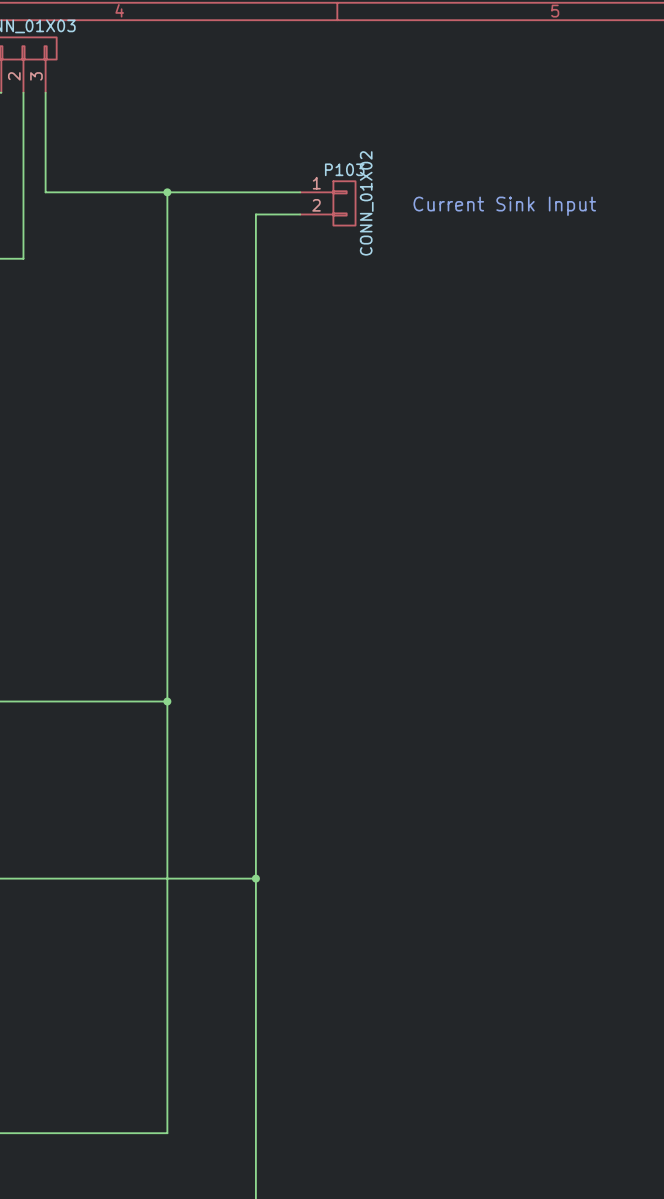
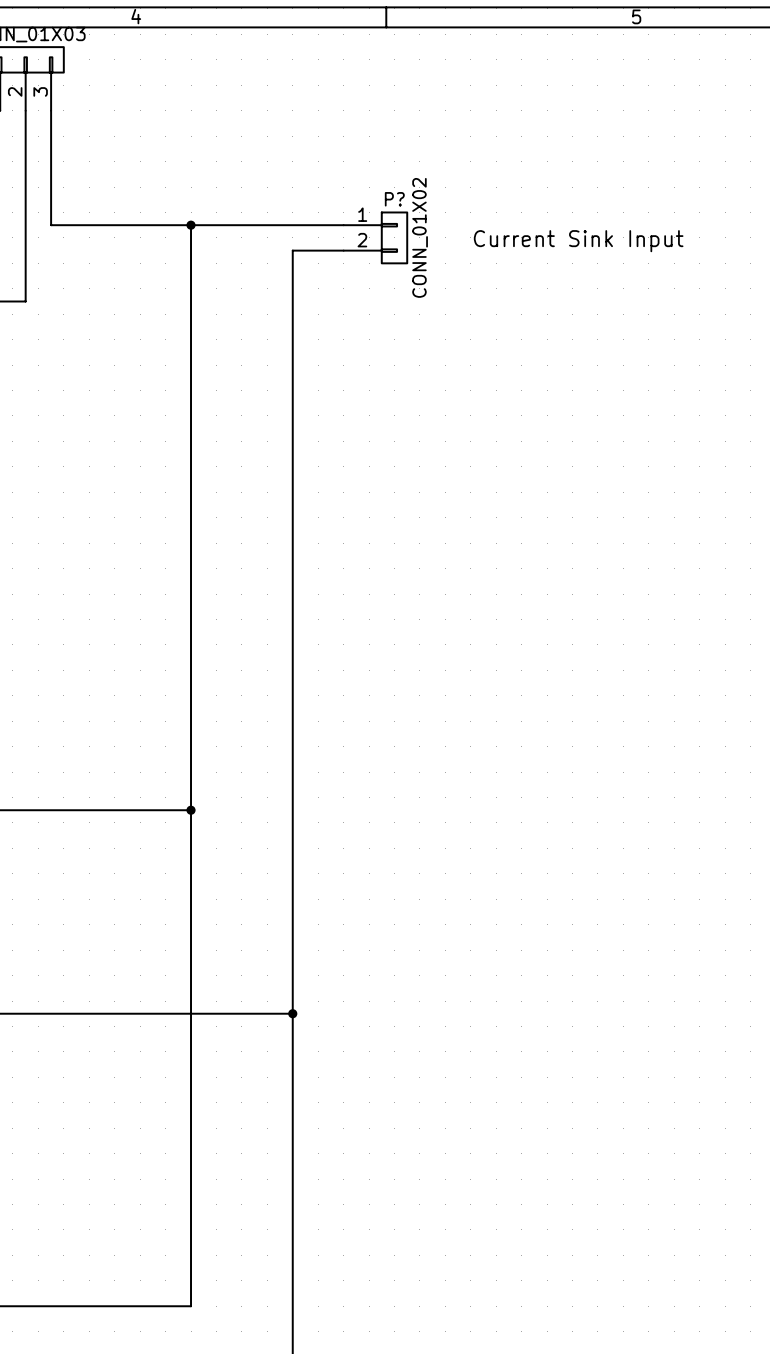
P103 name: P103 (344, 169) -> P? (394, 199)

